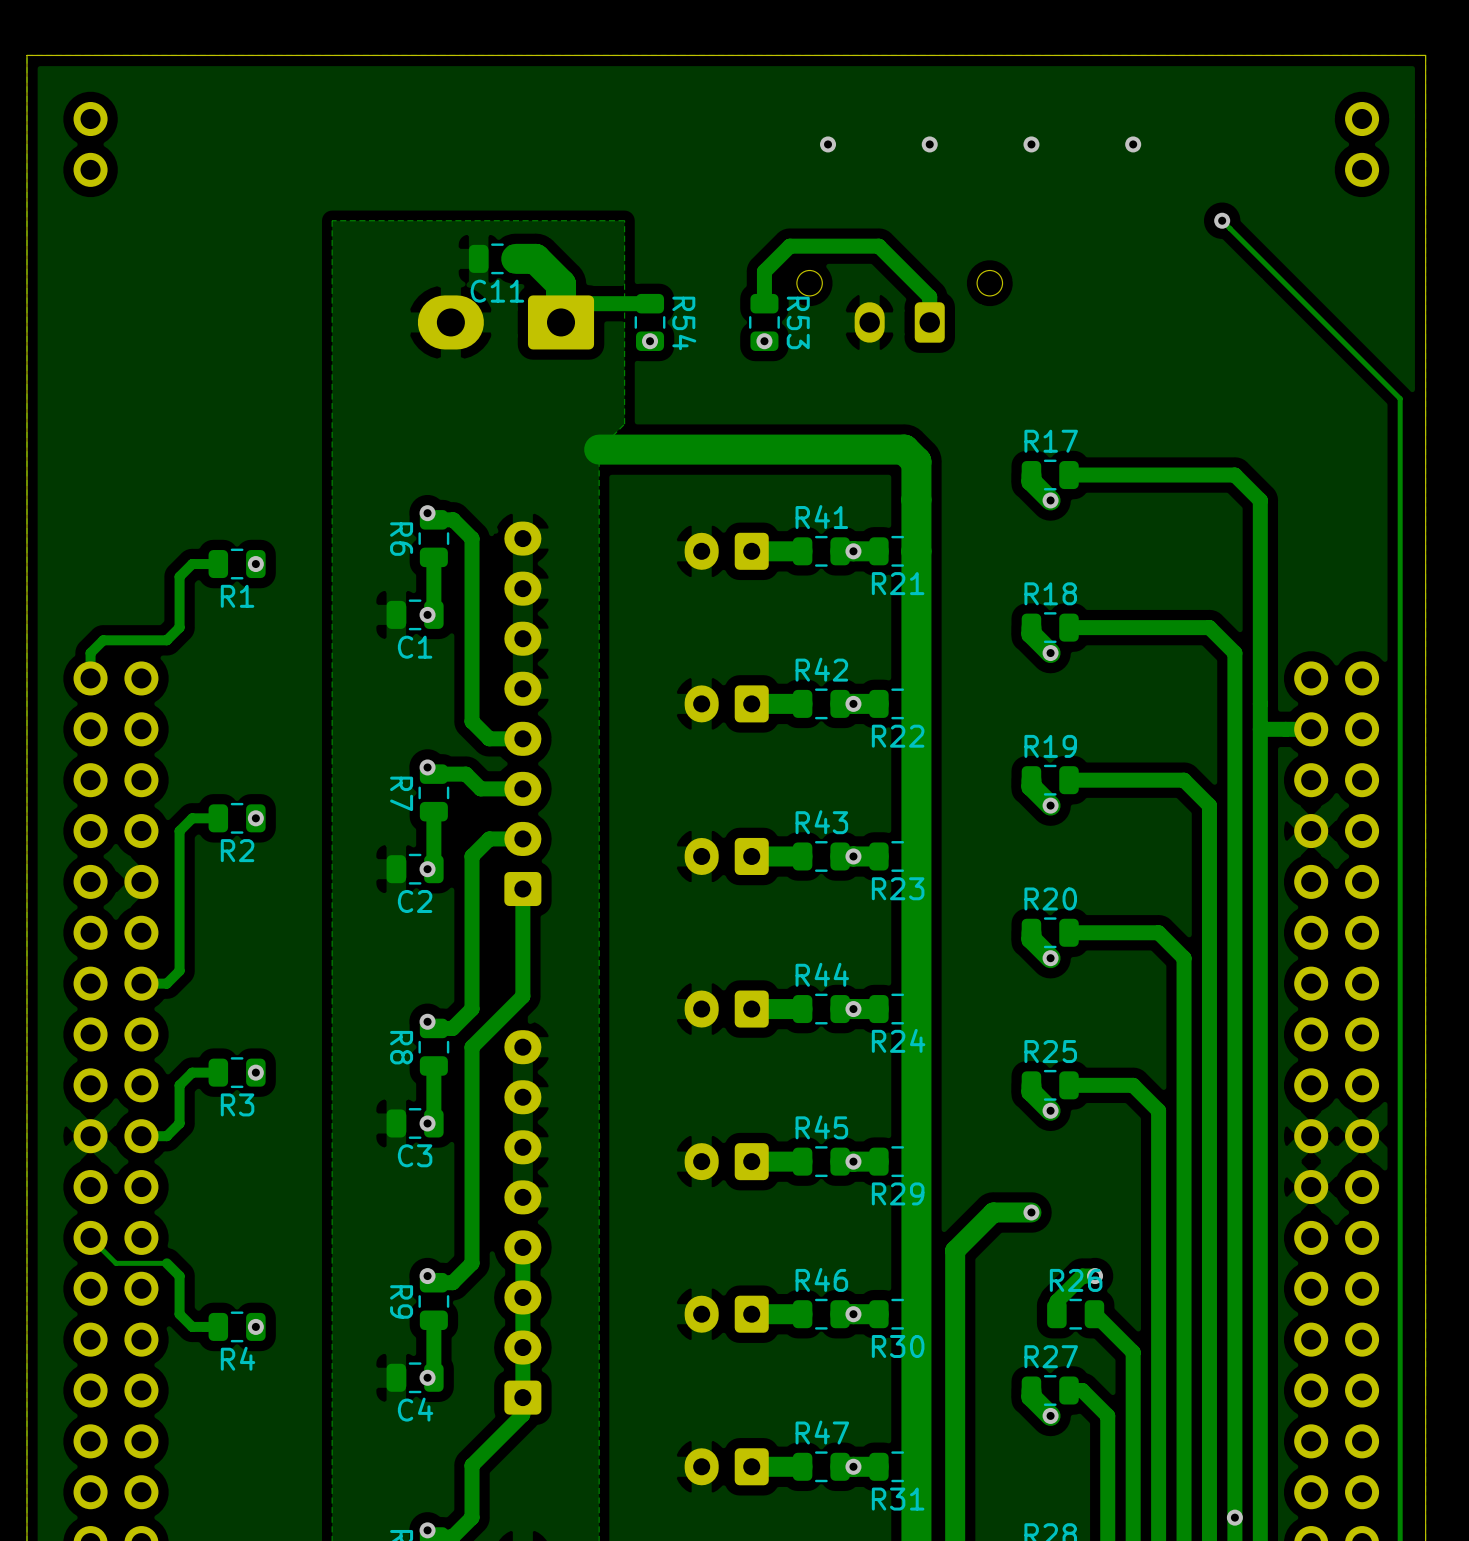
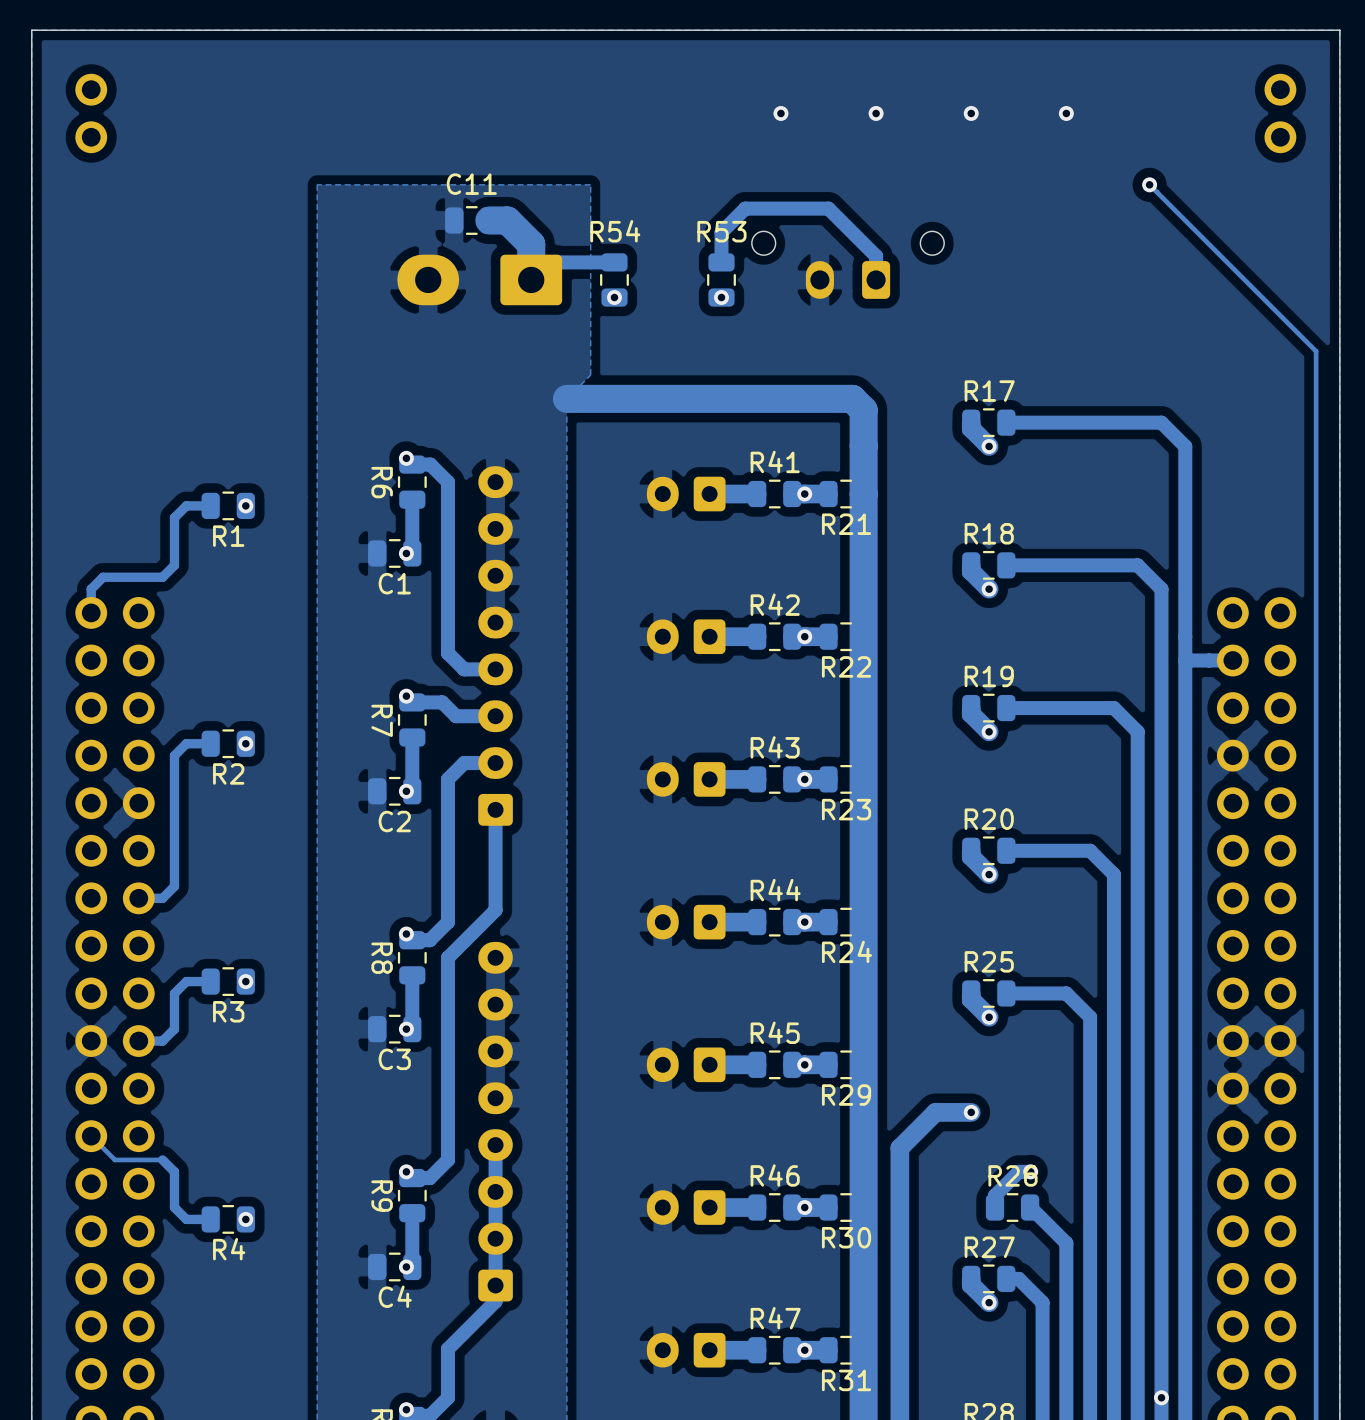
C11 name position: C11 (497, 291) -> C11 (471, 184)
R53 name rotation: 0° (798, 322) -> 90° counterclockwise (721, 231)
R54 name rotation: 0° (684, 323) -> 90° counterclockwise (615, 231)

